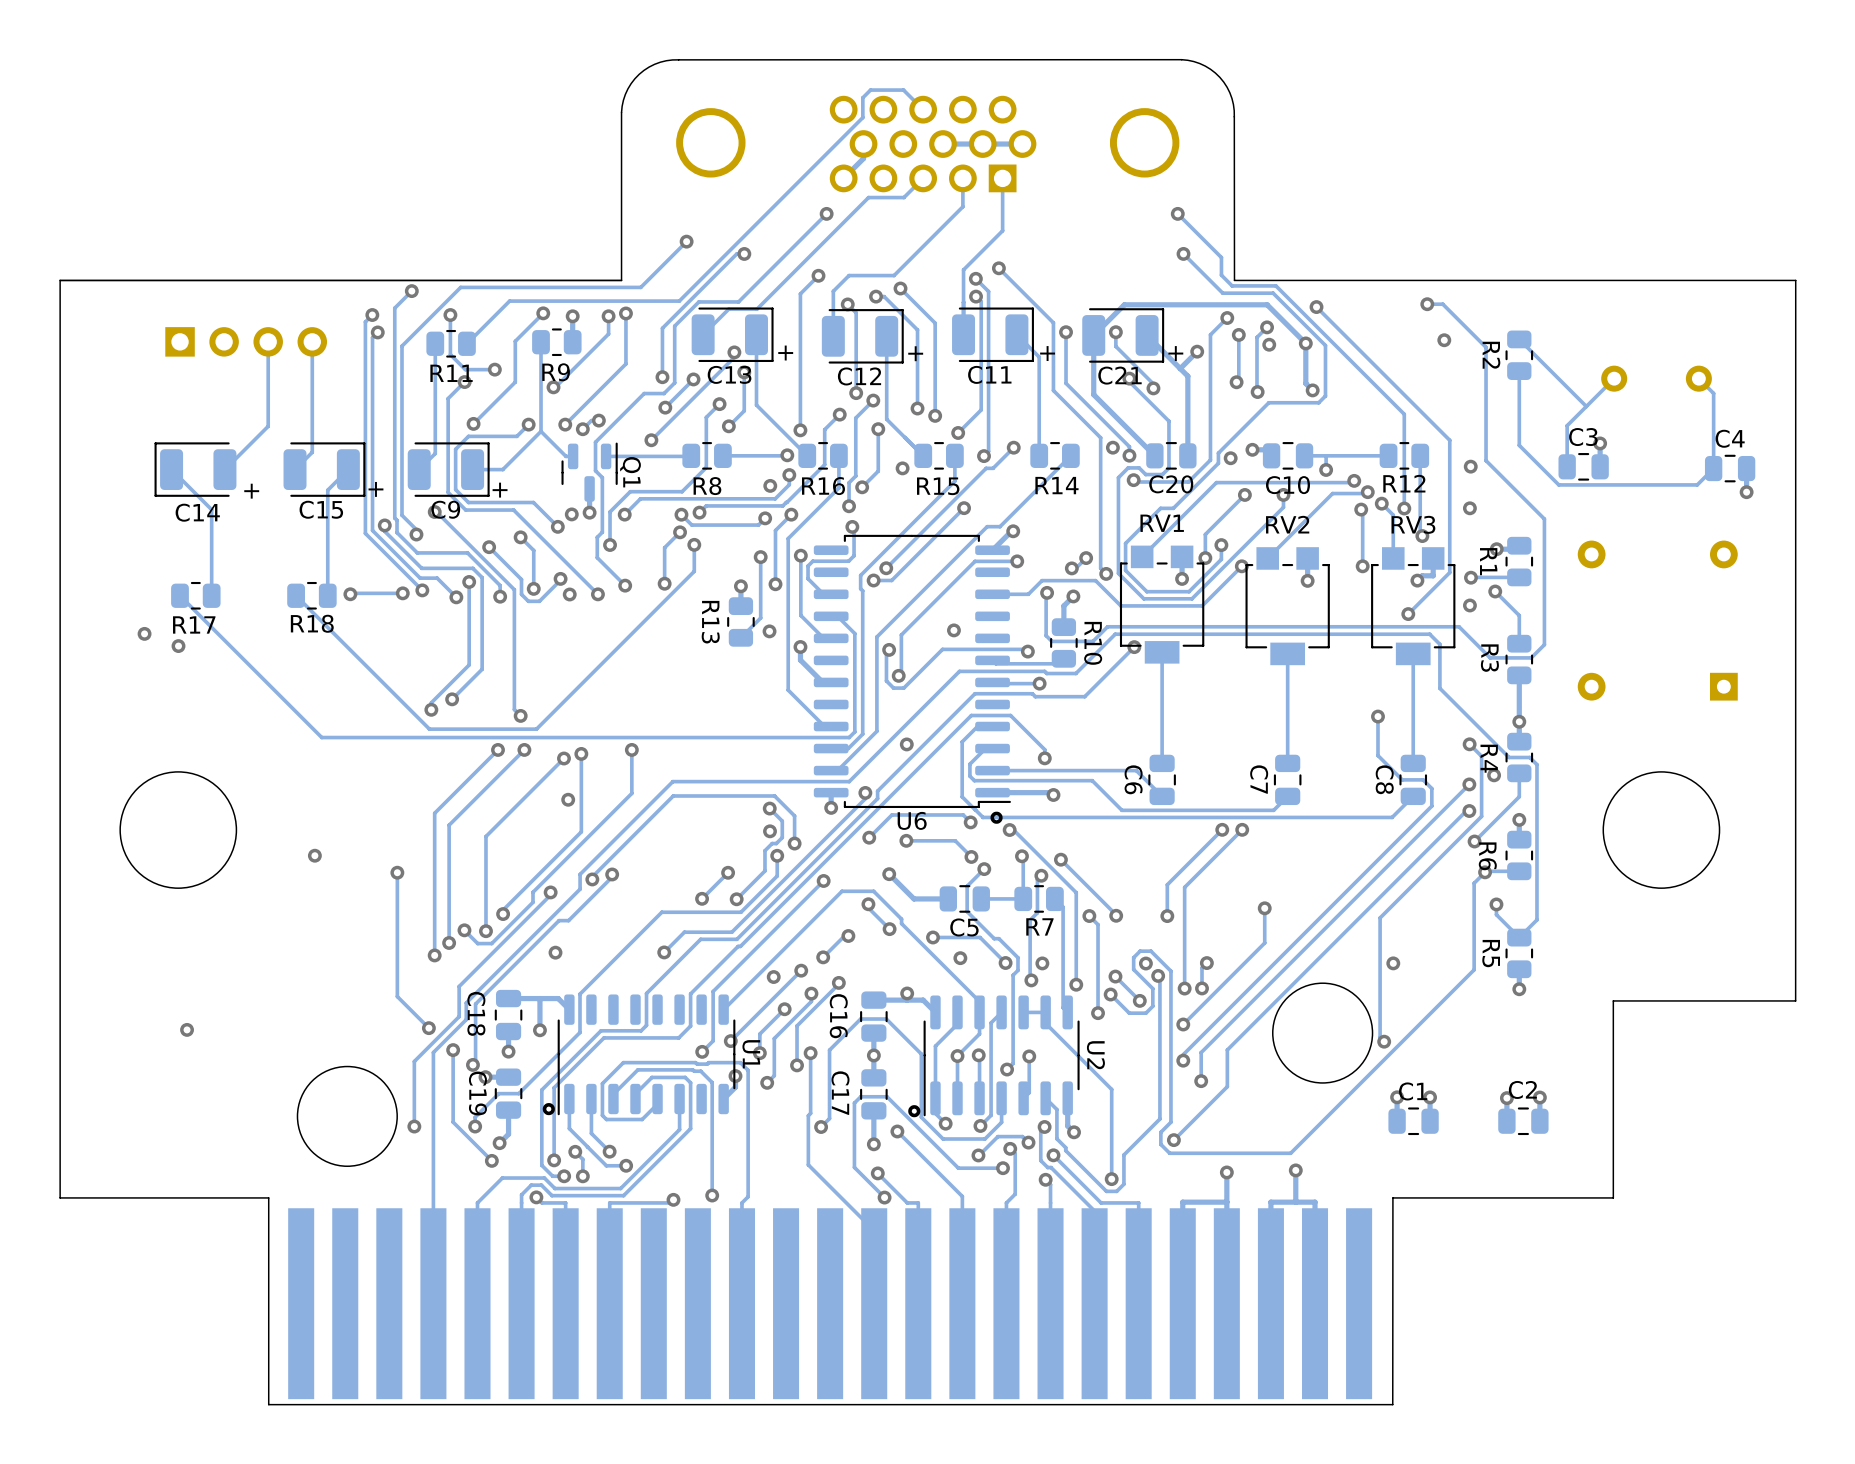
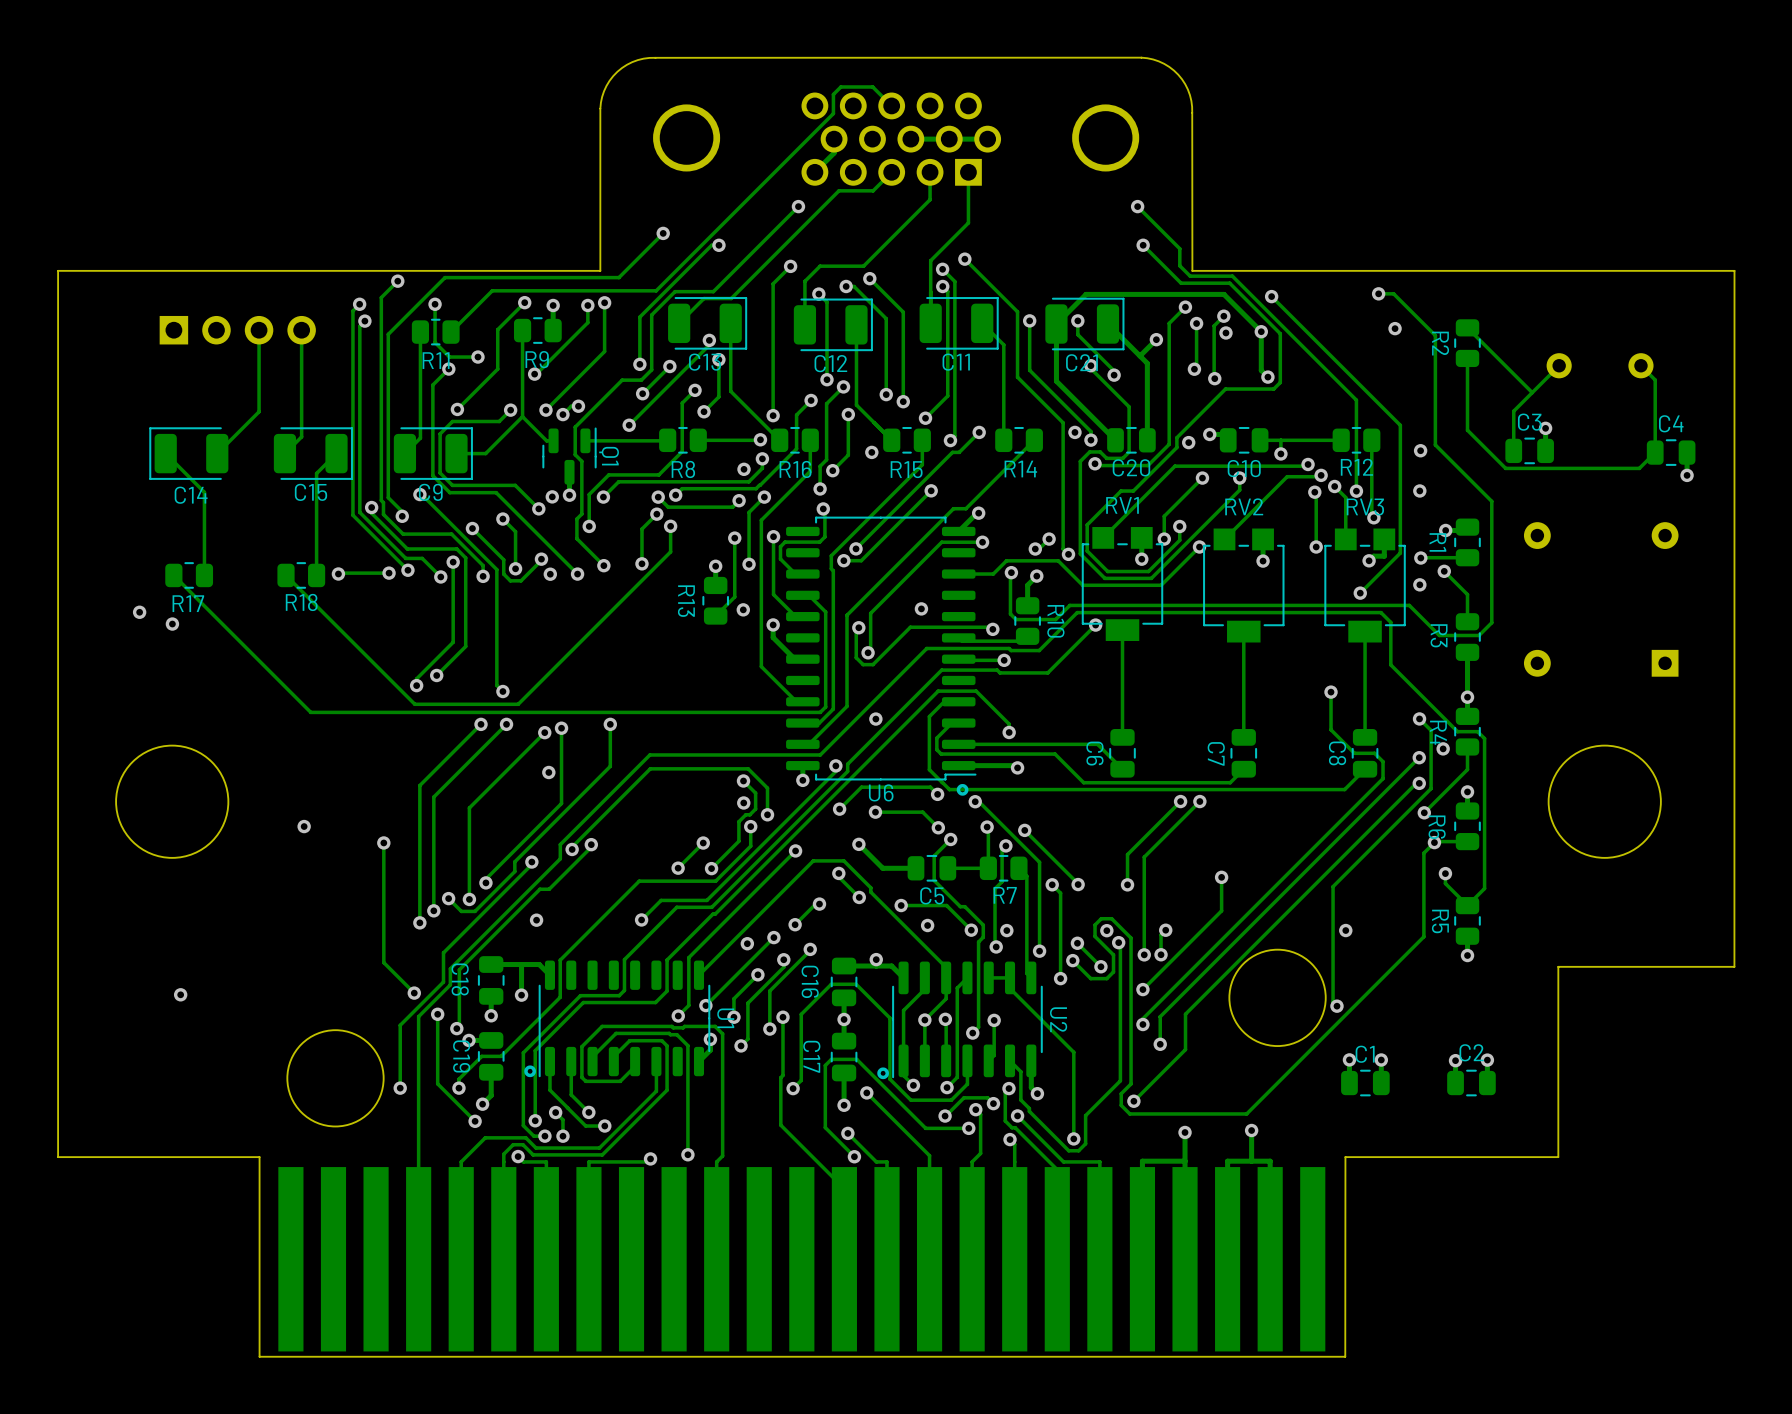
text: + (785, 353) -> none
text: + (915, 353) -> none
text: + (1047, 353) -> none
text: + (1175, 353) -> none
text: + (375, 489) -> none
text: + (500, 490) -> none
text: + (251, 491) -> none

